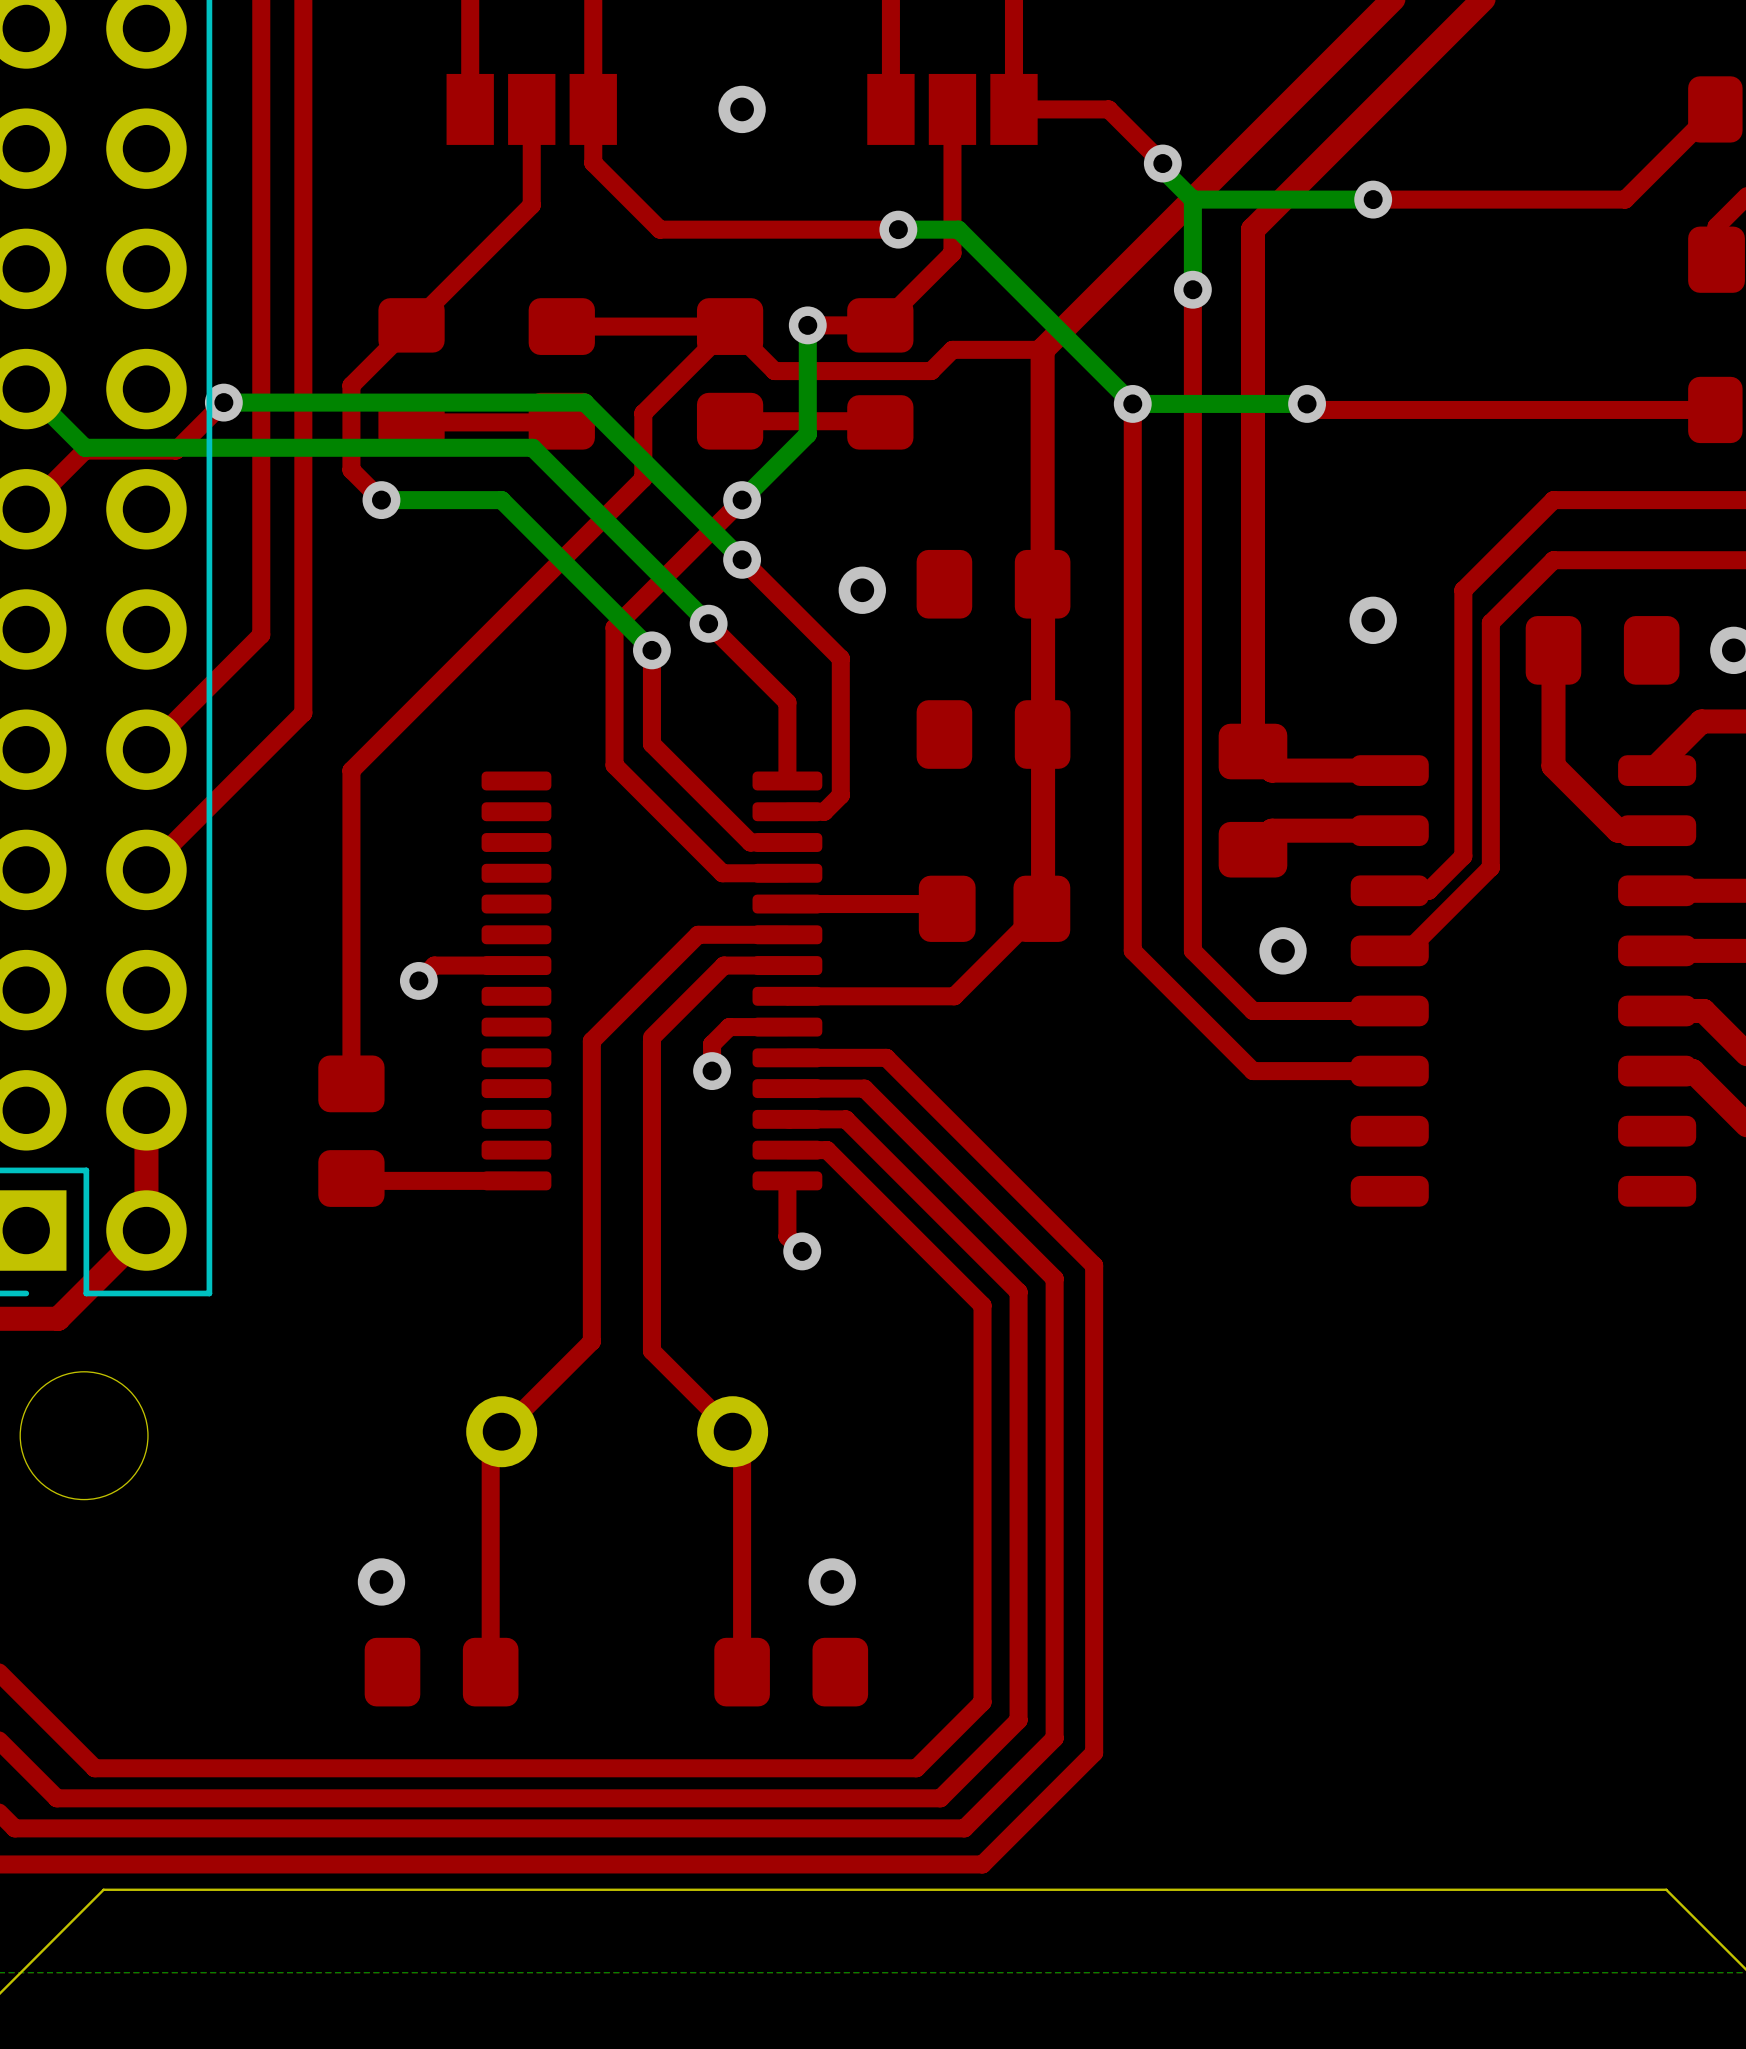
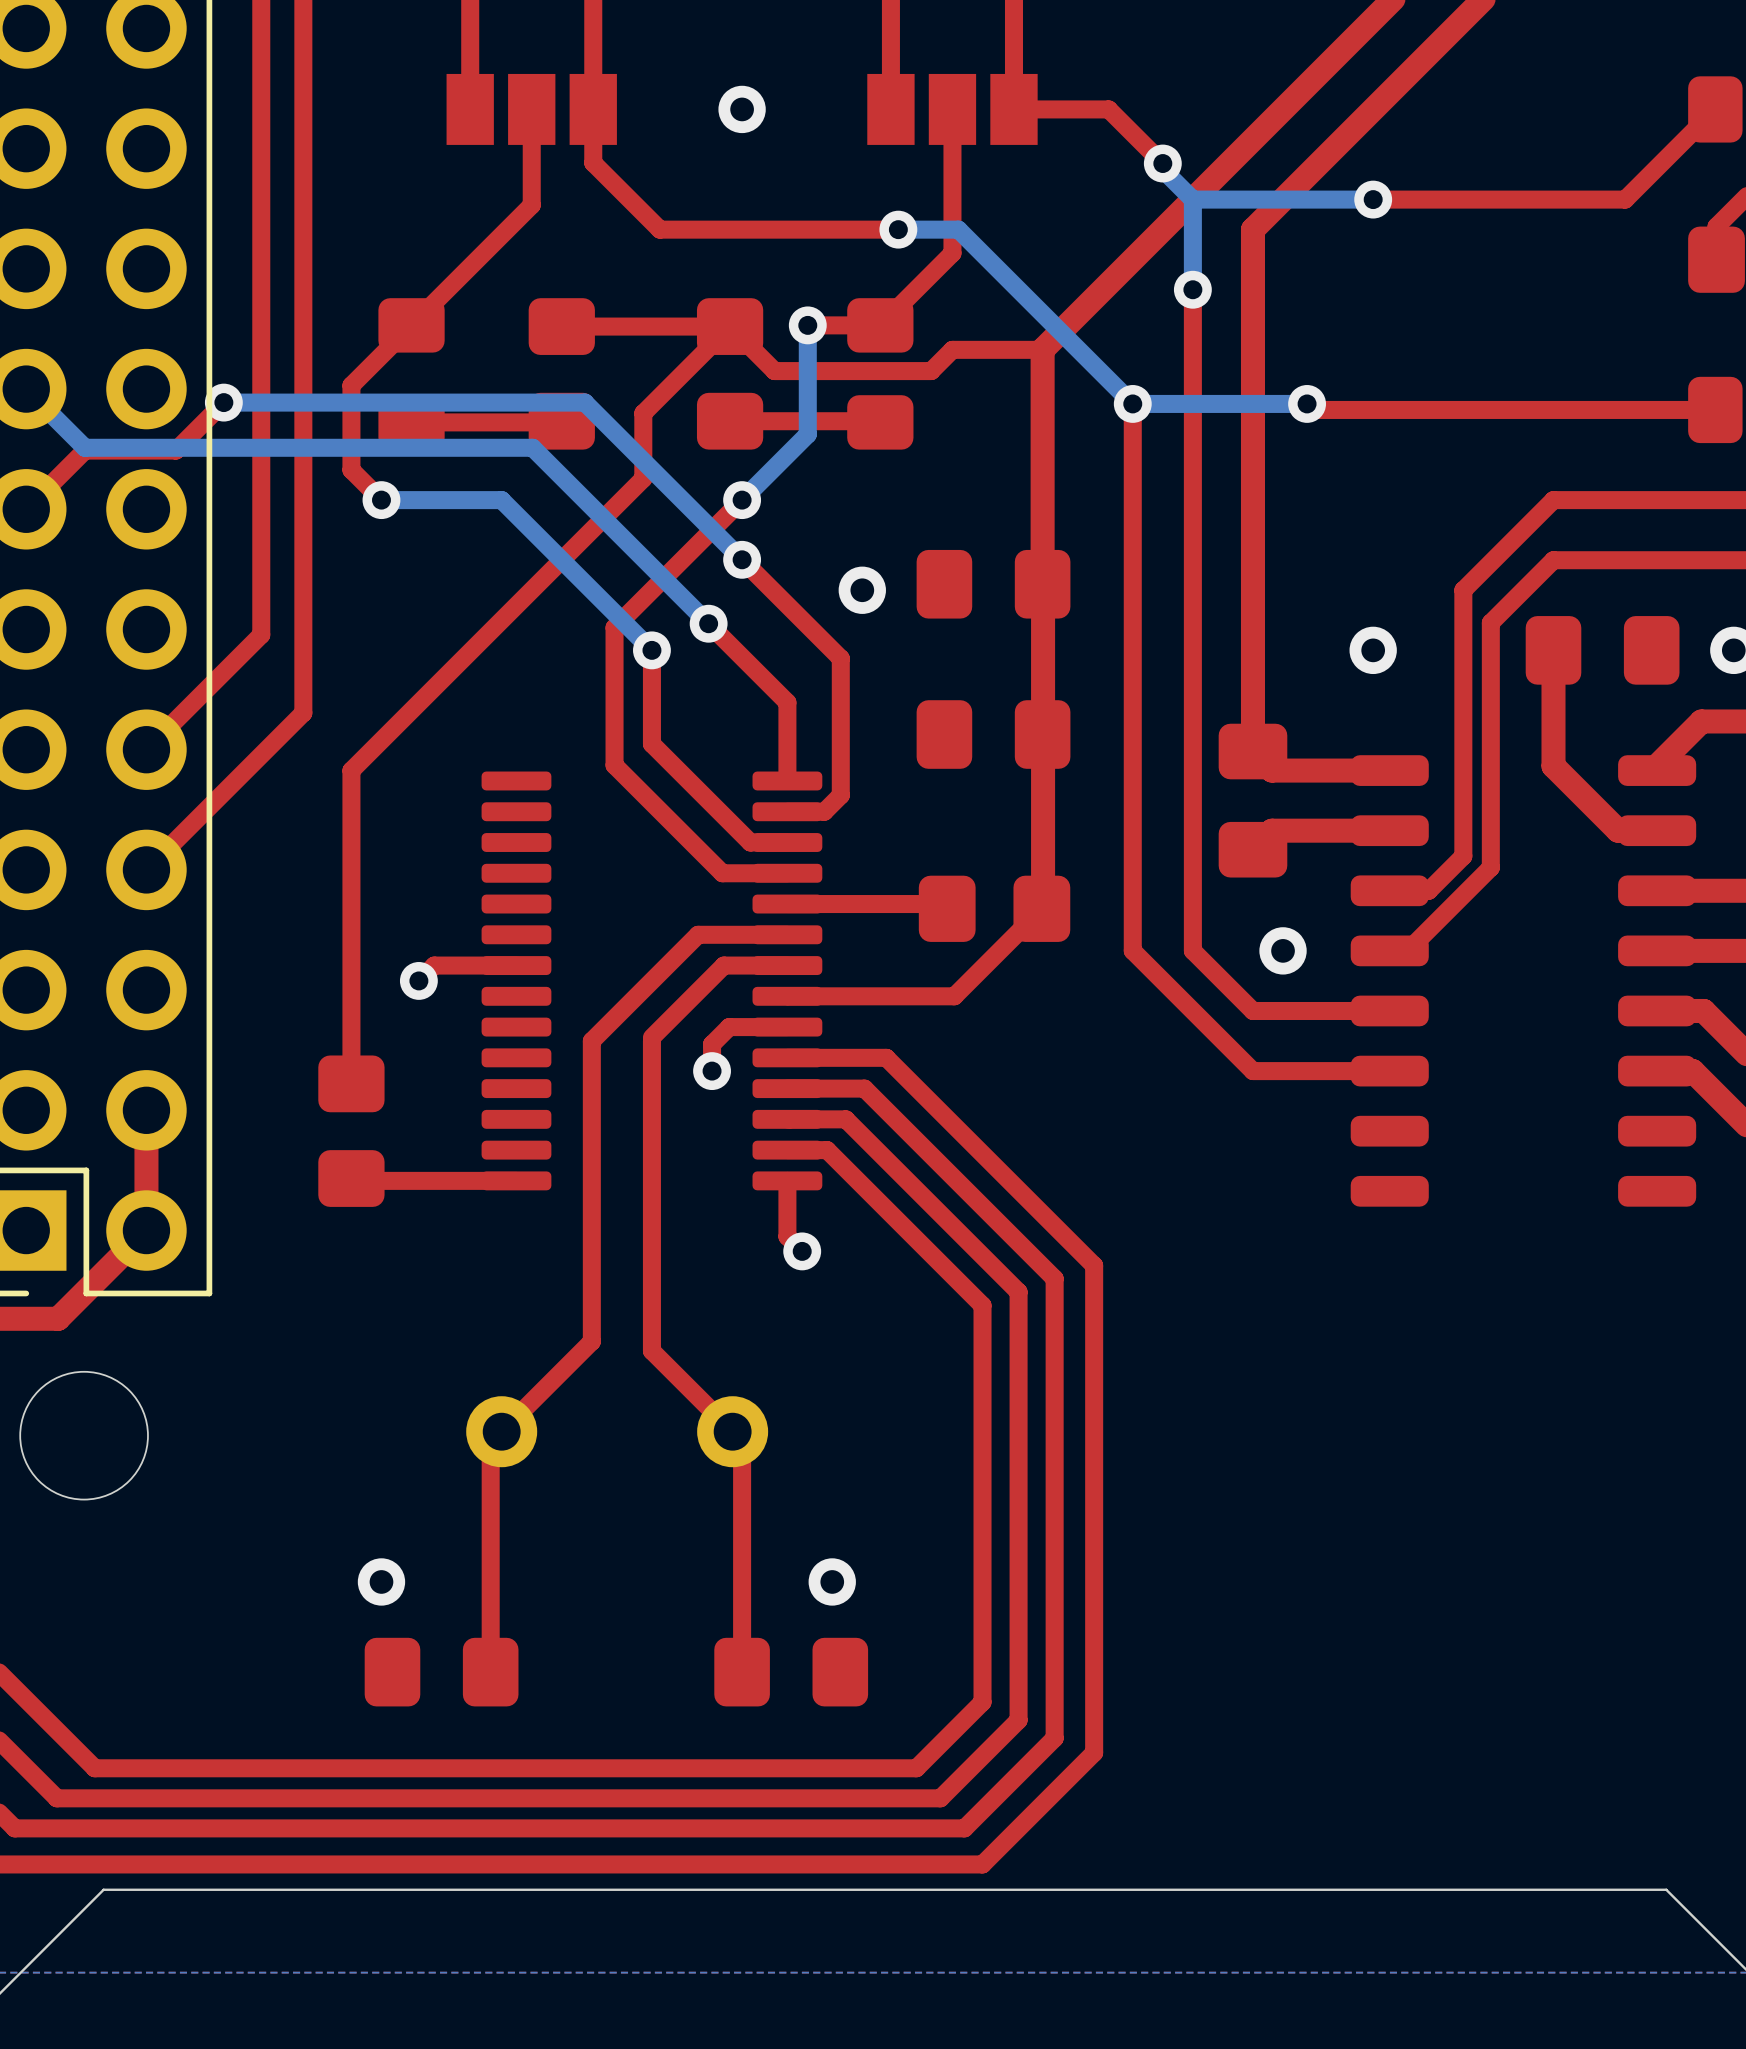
via position: (1373, 620) -> (1373, 650)

